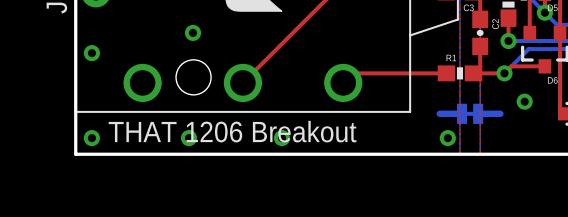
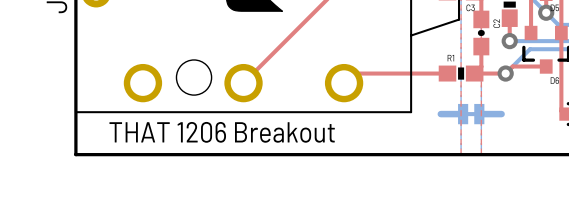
via: (193, 32) -> none
via: (91, 53) -> none
via: (524, 101) -> none
via: (91, 138) -> none
via: (188, 138) -> none
via: (282, 138) -> none
via: (447, 138) -> none

